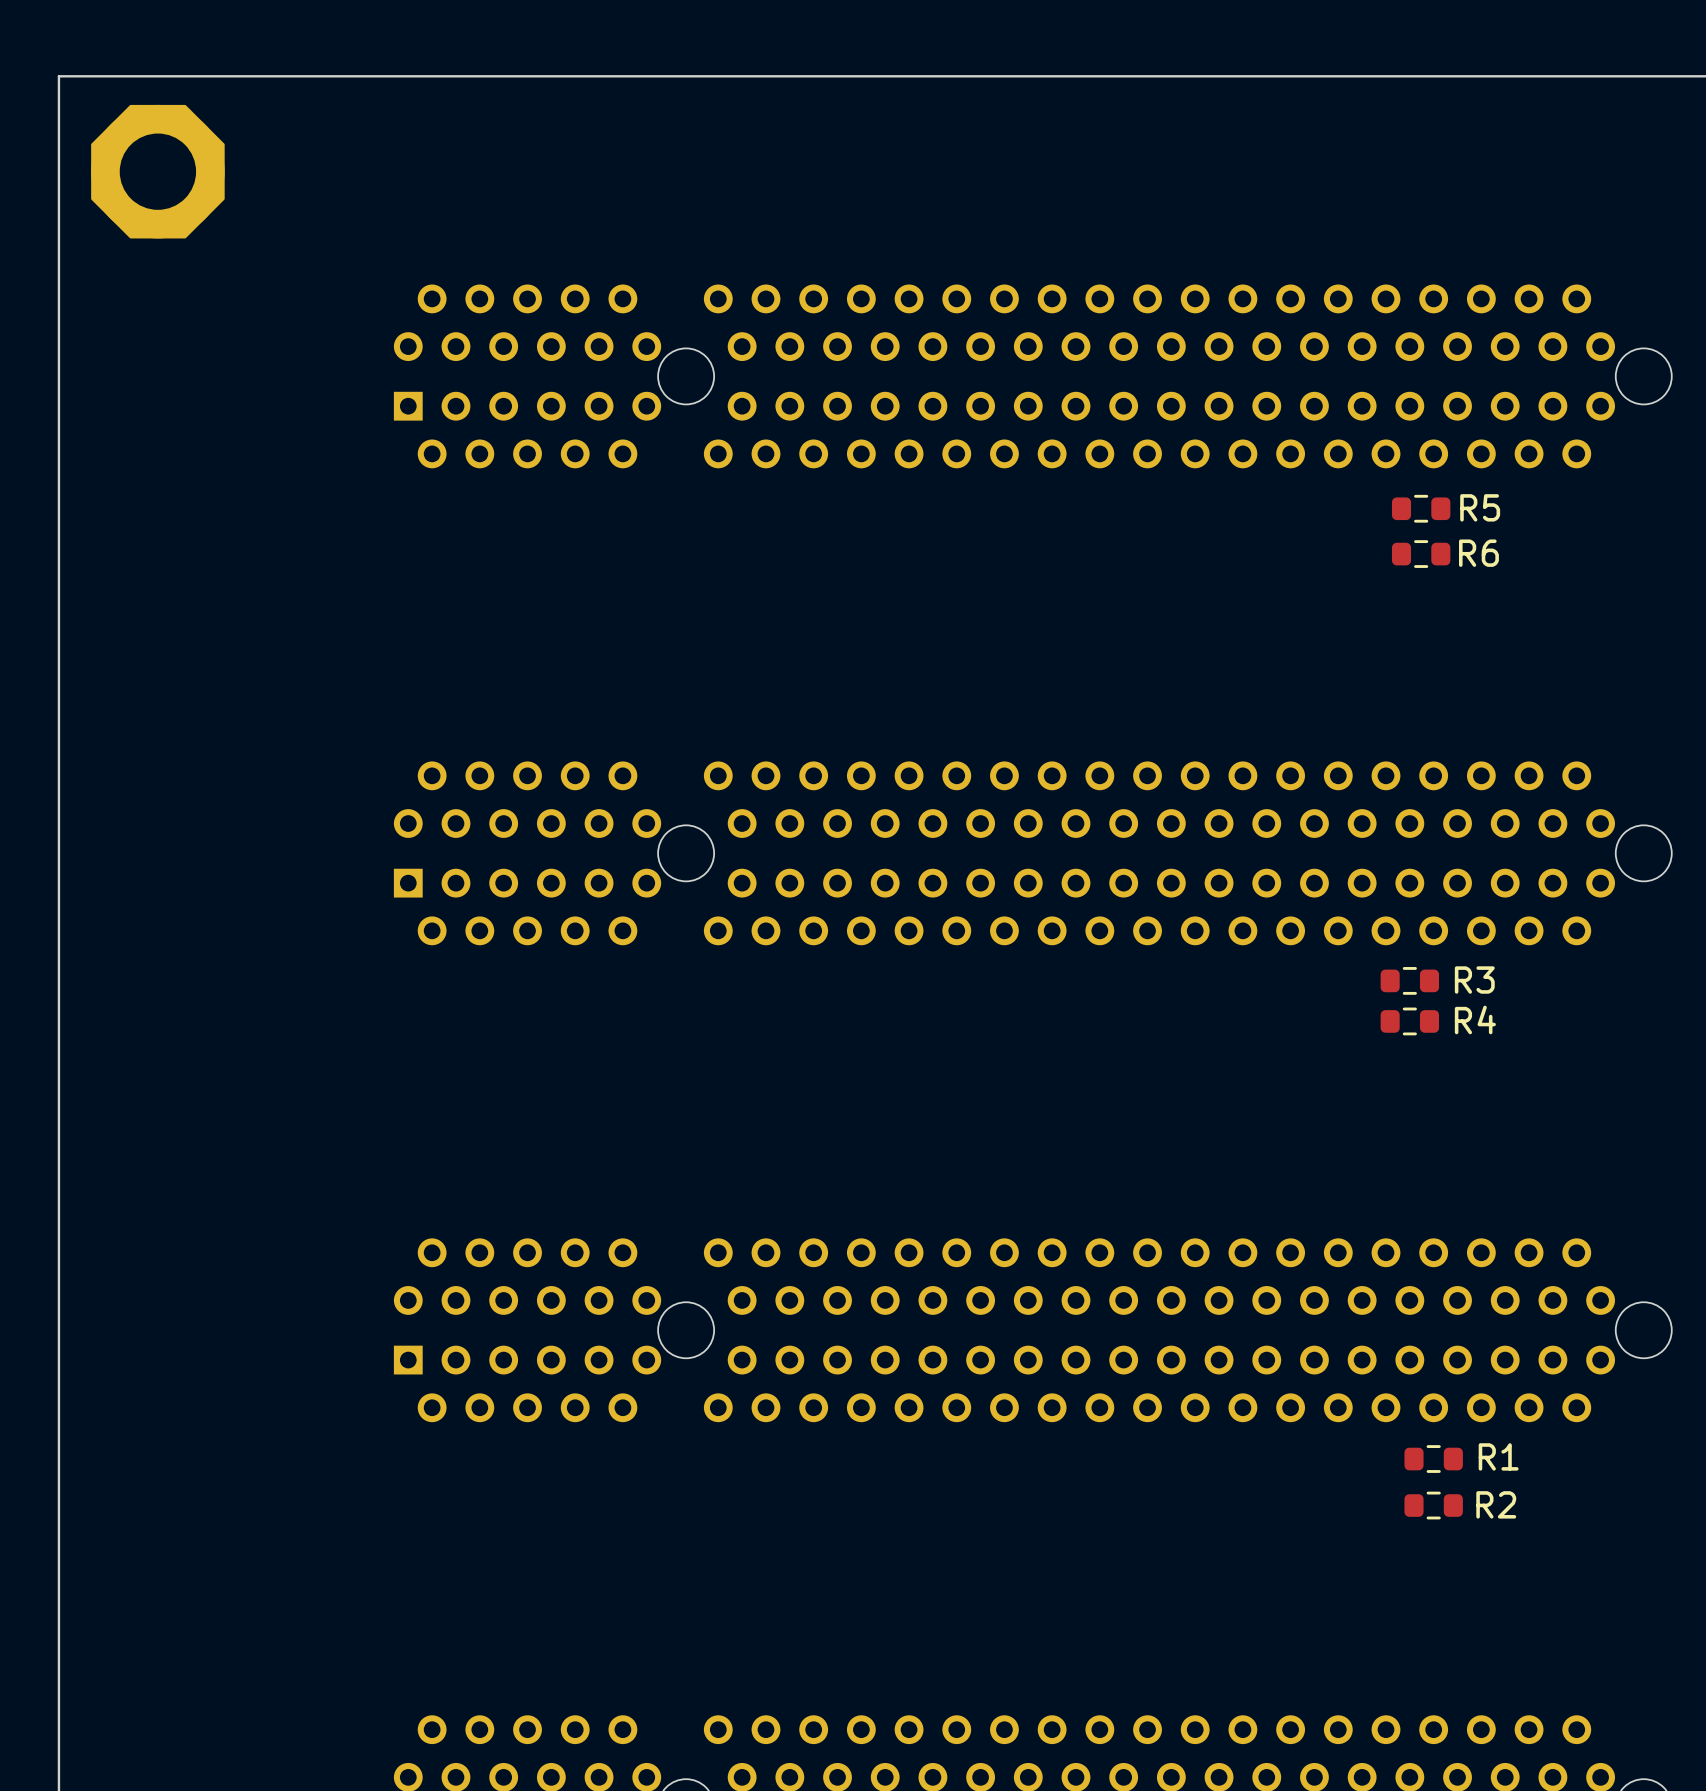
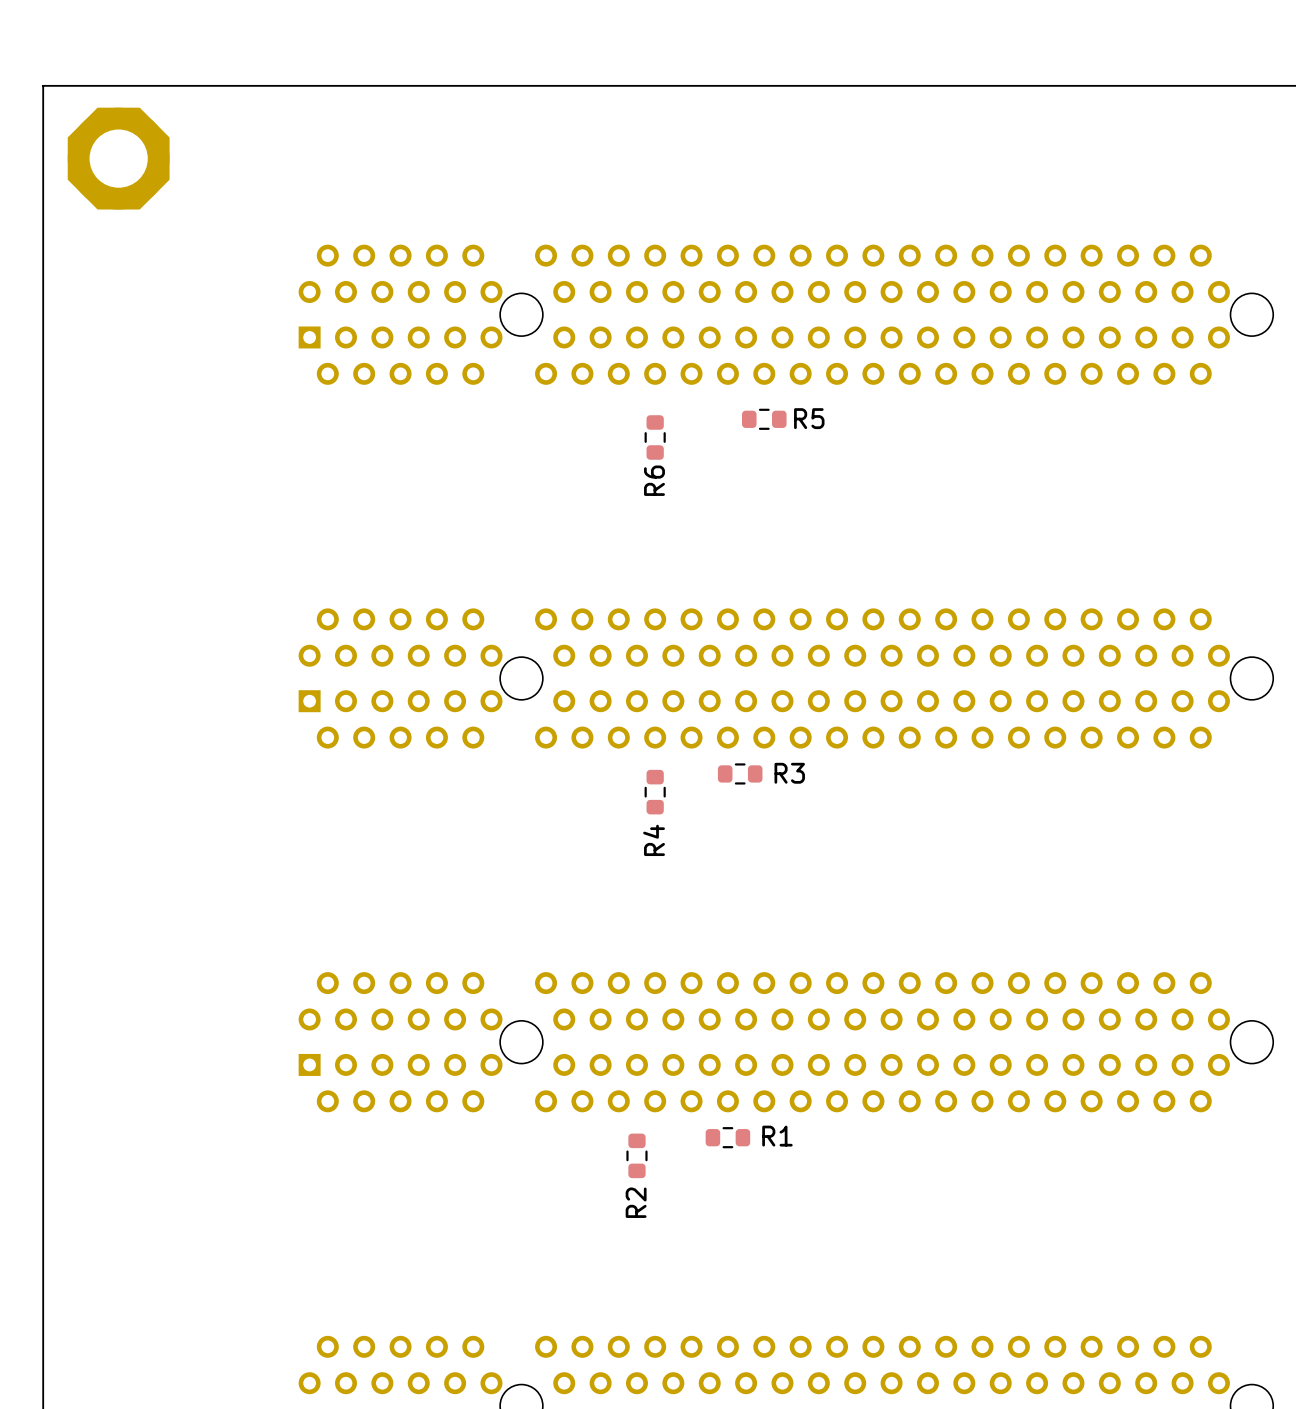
R5 position: (1421, 508) -> (764, 419)
R6 rotation: 0° (1421, 554) -> 90° clockwise (655, 437)
R6 position: (1421, 554) -> (655, 437)
R3 position: (1409, 980) -> (740, 773)
R4 rotation: 0° (1409, 1021) -> 90° clockwise (655, 792)
R4 position: (1409, 1021) -> (655, 792)
R1 position: (1433, 1459) -> (727, 1137)
R2 rotation: 0° (1433, 1505) -> 90° clockwise (636, 1155)
R2 position: (1433, 1505) -> (636, 1155)

